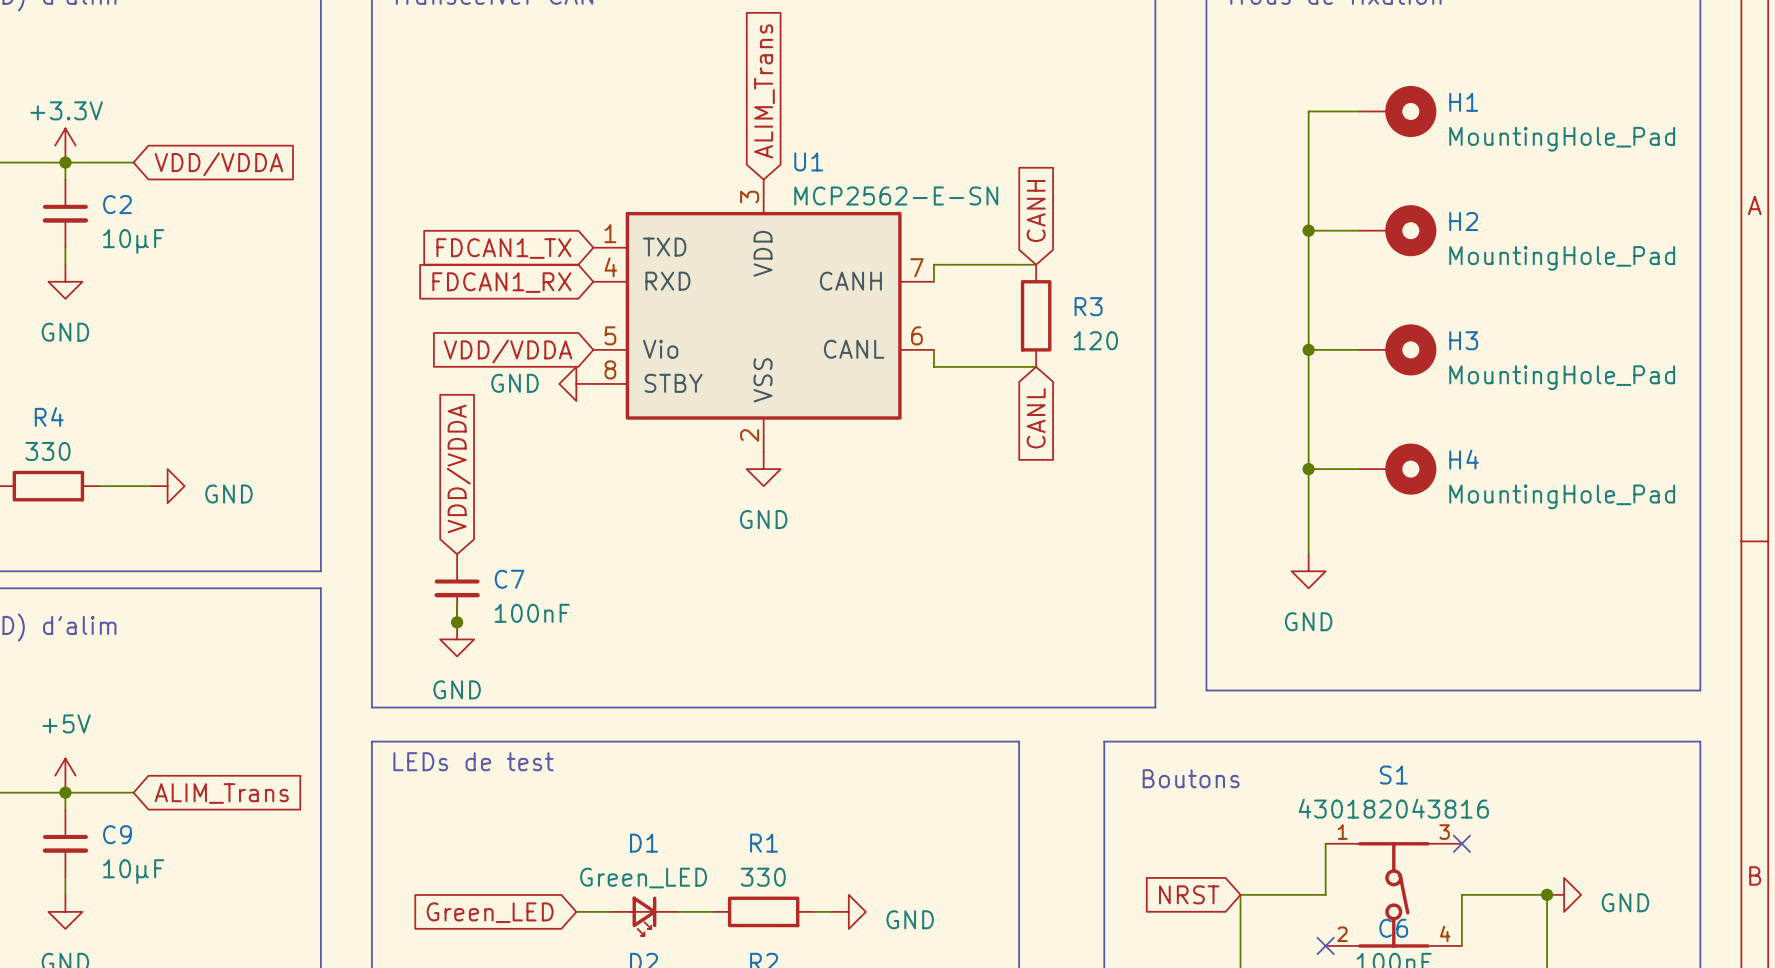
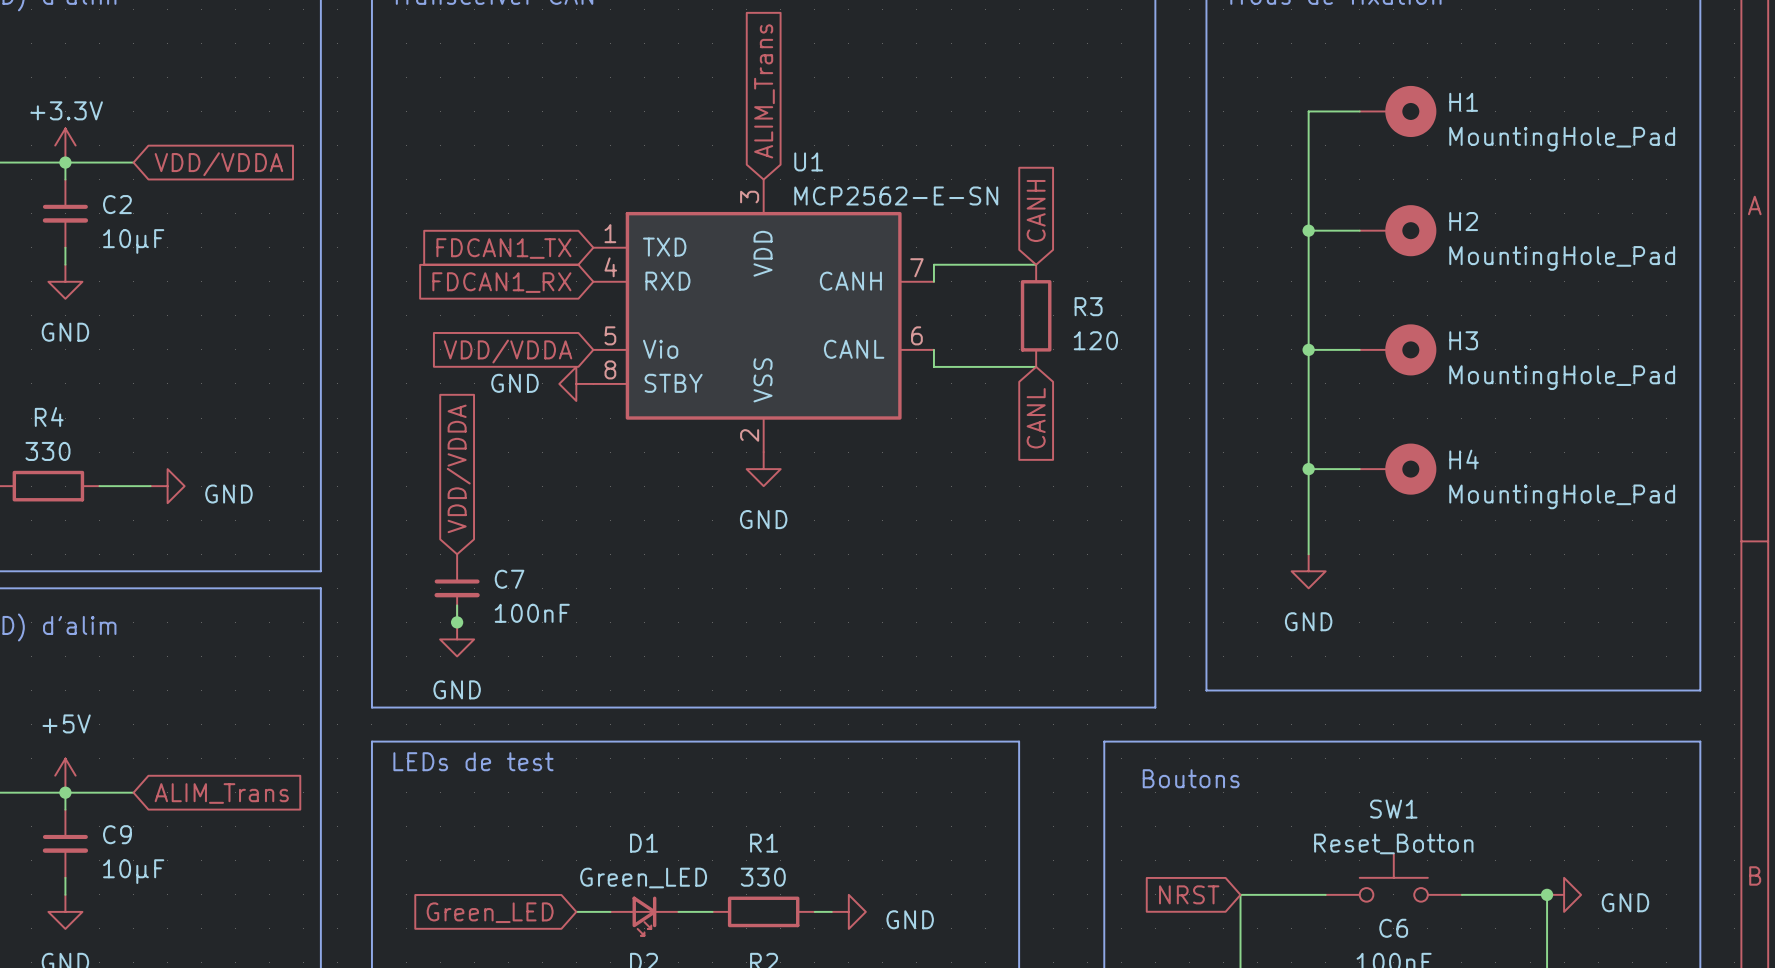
wire: (1325, 843) (1325, 894) -> none
no-connect mark: (1461, 843) -> none
SW1: none -> Reset_Botton (1393, 877)
S1: 430182043816 (1393, 894) -> none
wire: (1461, 894) (1461, 945) -> none
no-connect mark: (1325, 945) -> none

